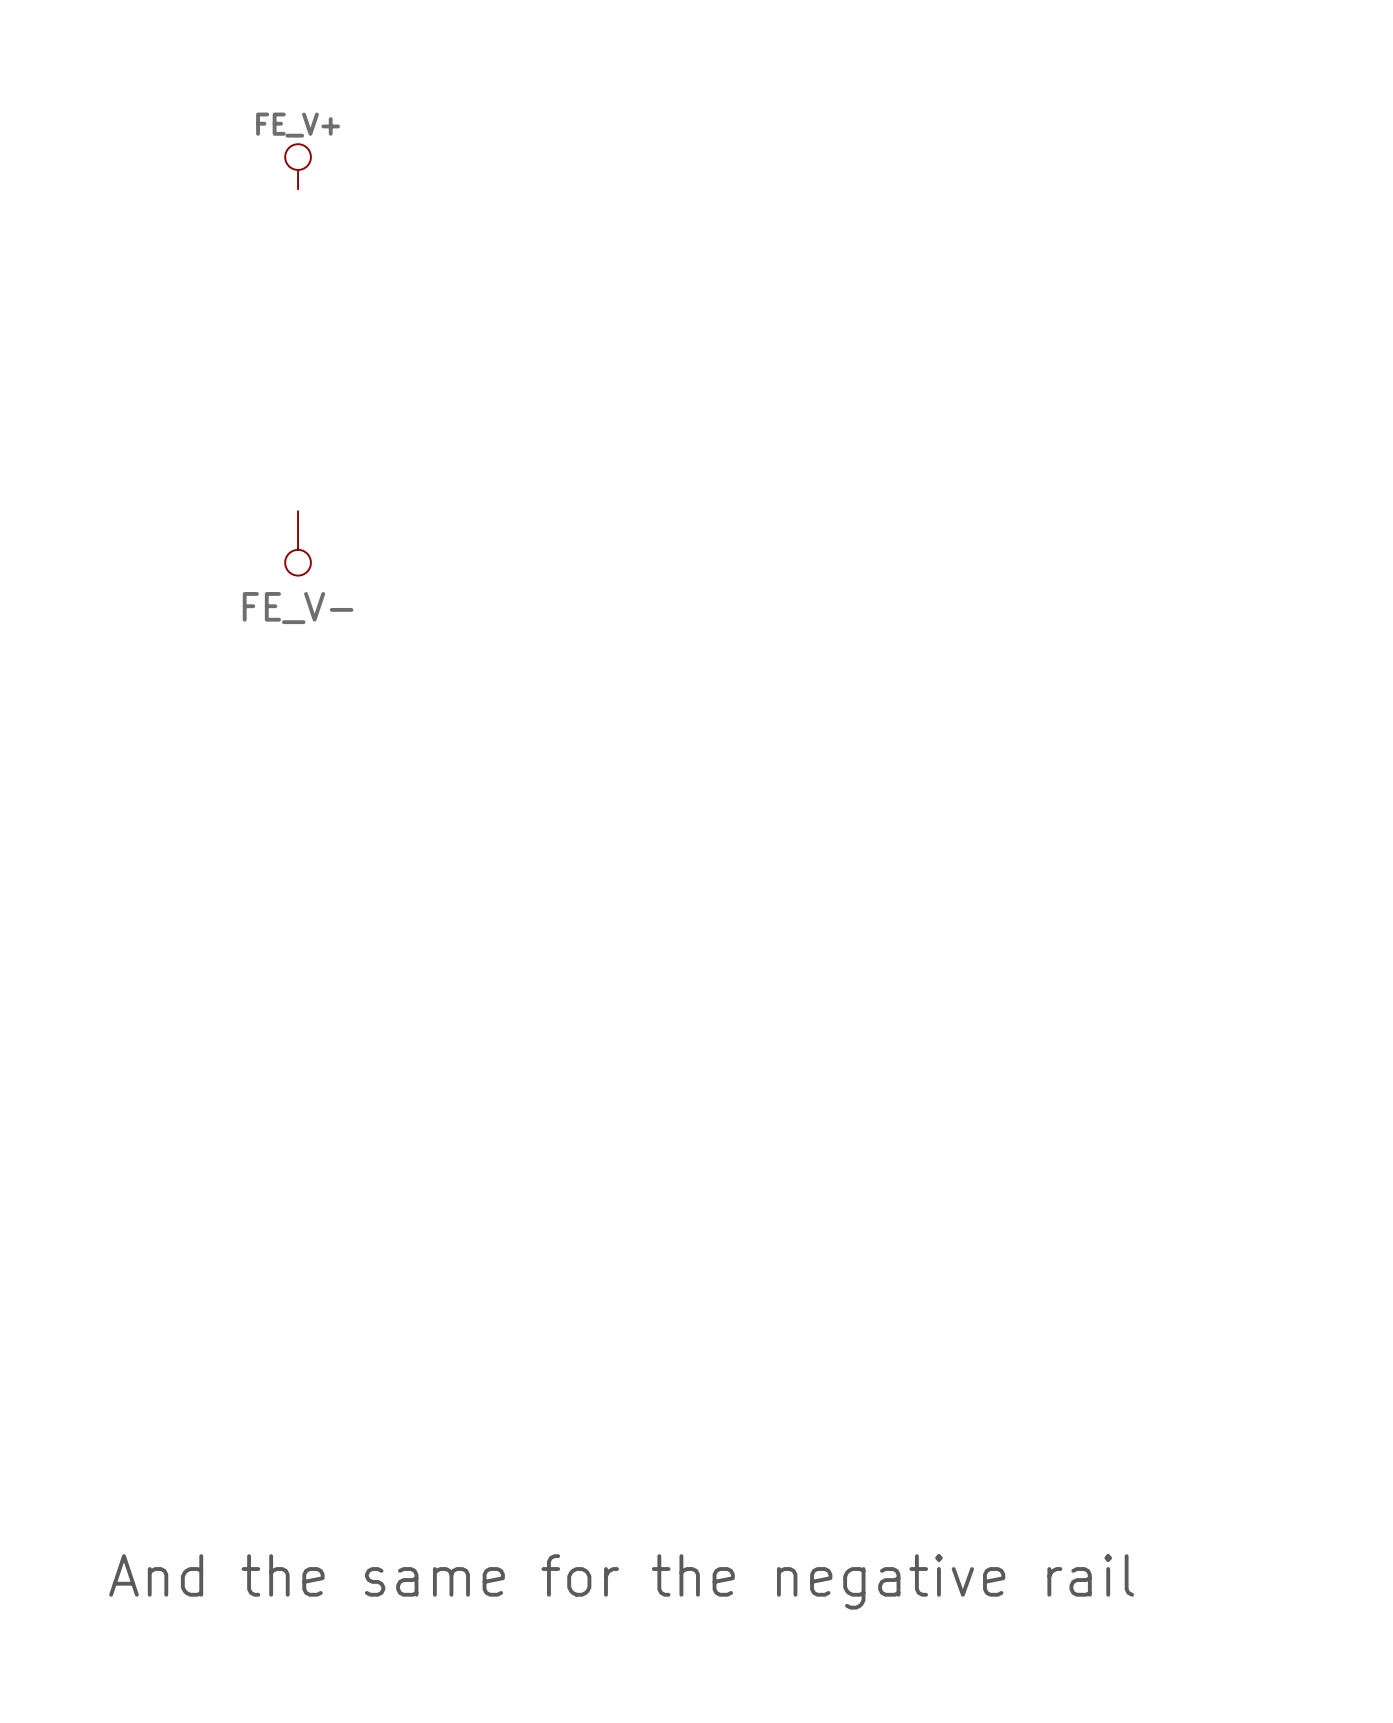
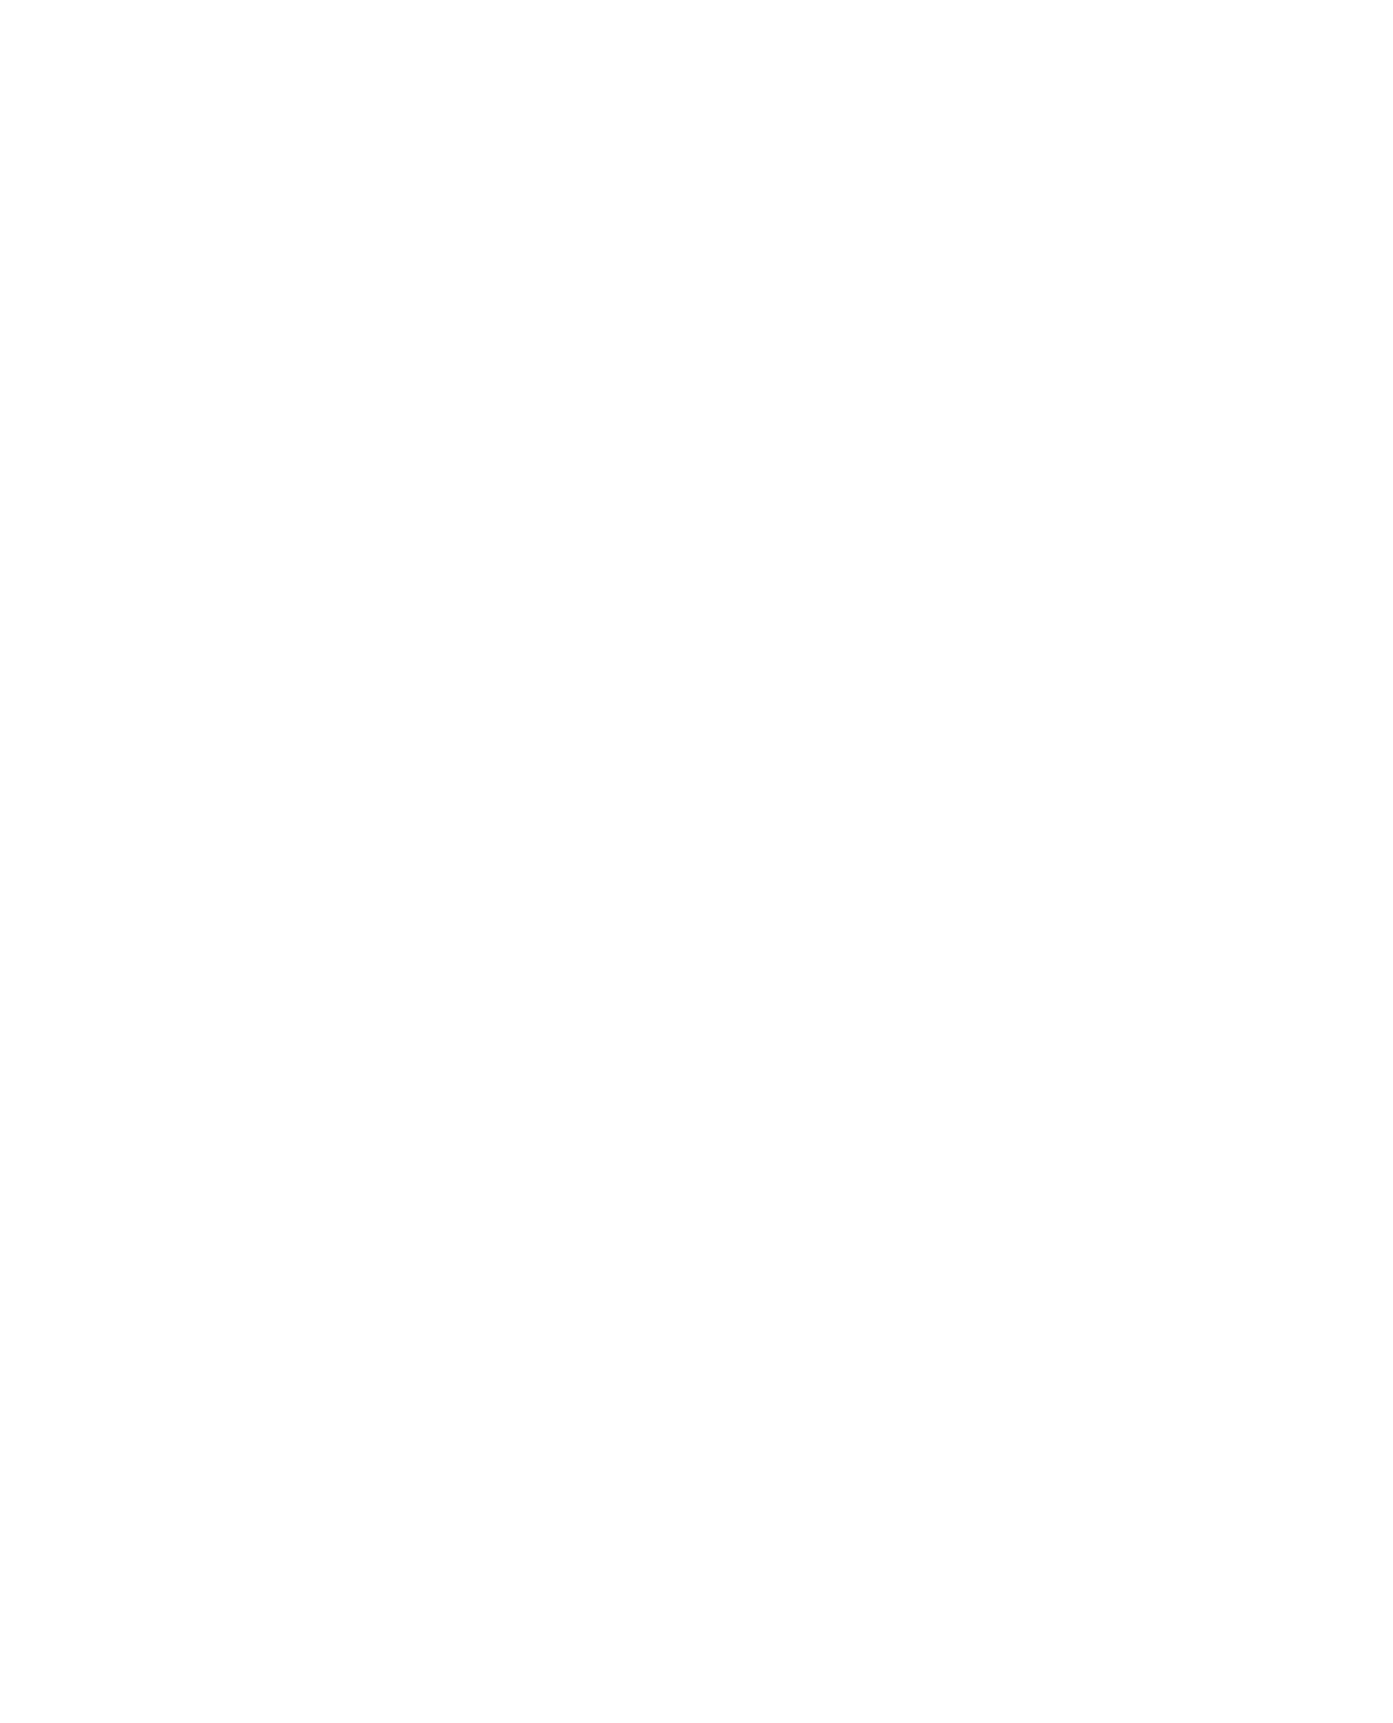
power symbol: FE_V+ (298, 166) -> none
power symbol: FE_V- (298, 543) -> none
text: And the same for the negative rail (621, 1581) -> none

